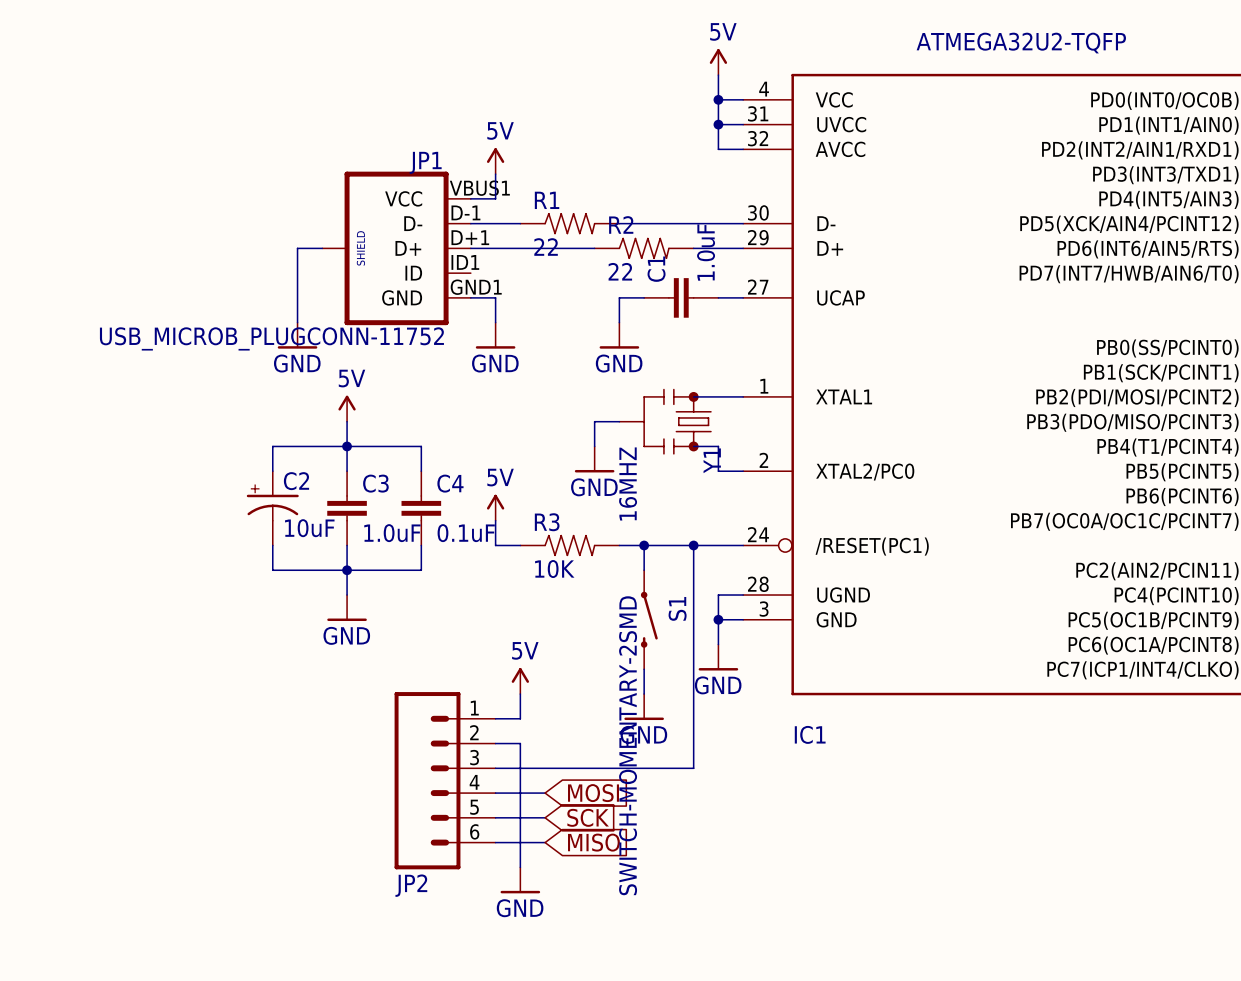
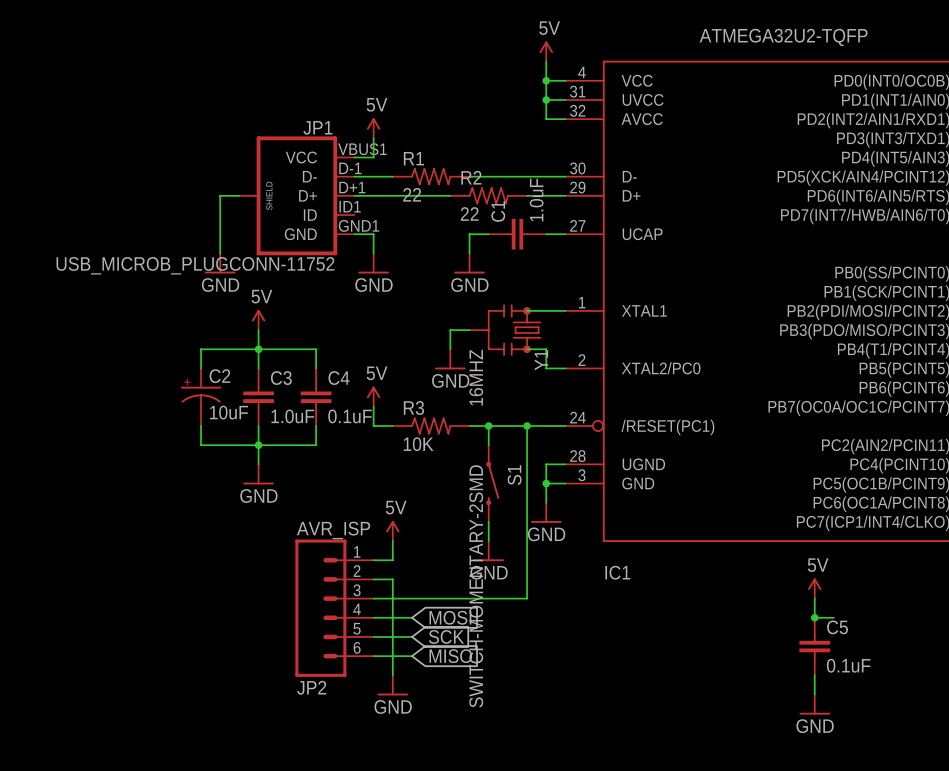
JP2 value: none -> AVR_ISP (333, 530)
power symbol: none -> 5V (814, 588)
wire: none -> (814, 598) (814, 617) (833, 617)
junction: none -> (814, 617)
C5: none -> 0.1uF (814, 646)
wire: none -> (814, 675) (814, 694)
power symbol: none -> GND (814, 704)

